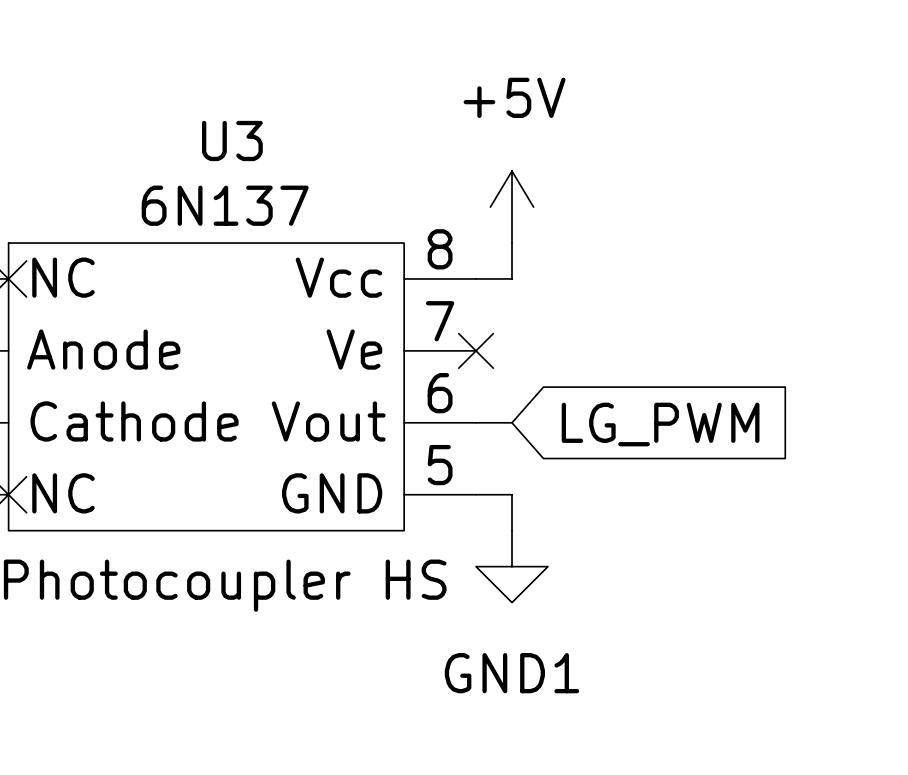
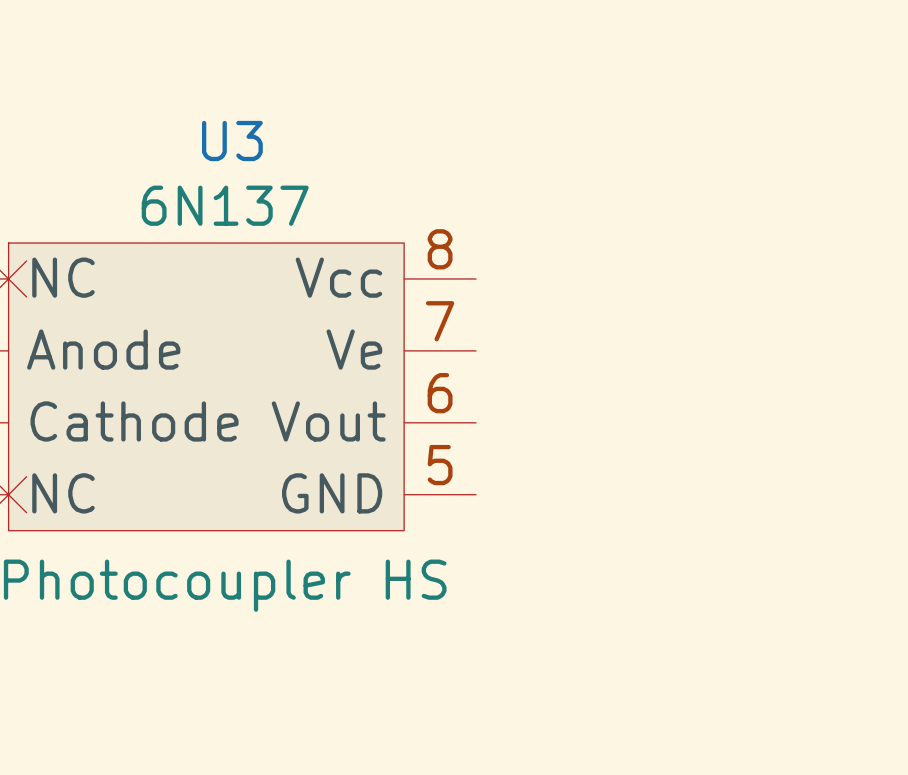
power symbol: +5V (512, 207) -> none
wire: (512, 243) (512, 278) (476, 278) -> none
no-connect mark: (476, 350) -> none
wire: (476, 422) (512, 422) -> none
global label: LG_PWM (660, 424) -> none
wire: (476, 494) (512, 494) (512, 530) -> none
power symbol: GND1 (512, 566) -> none

